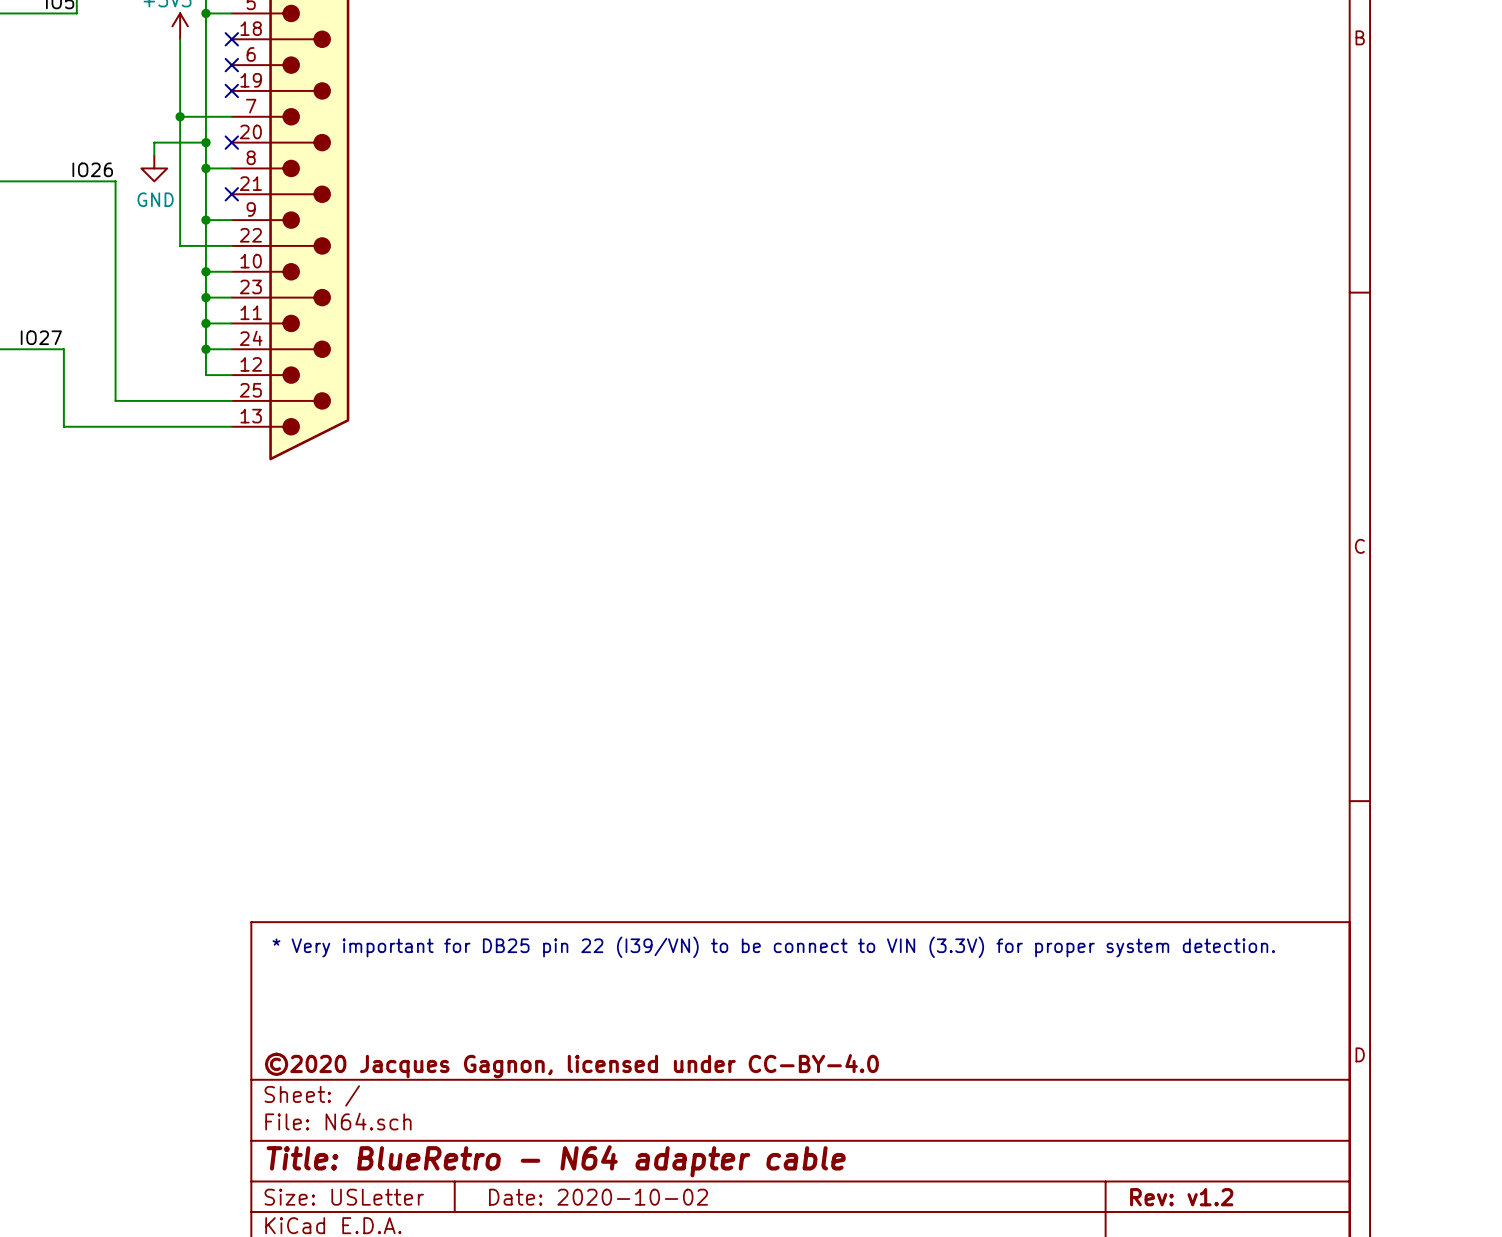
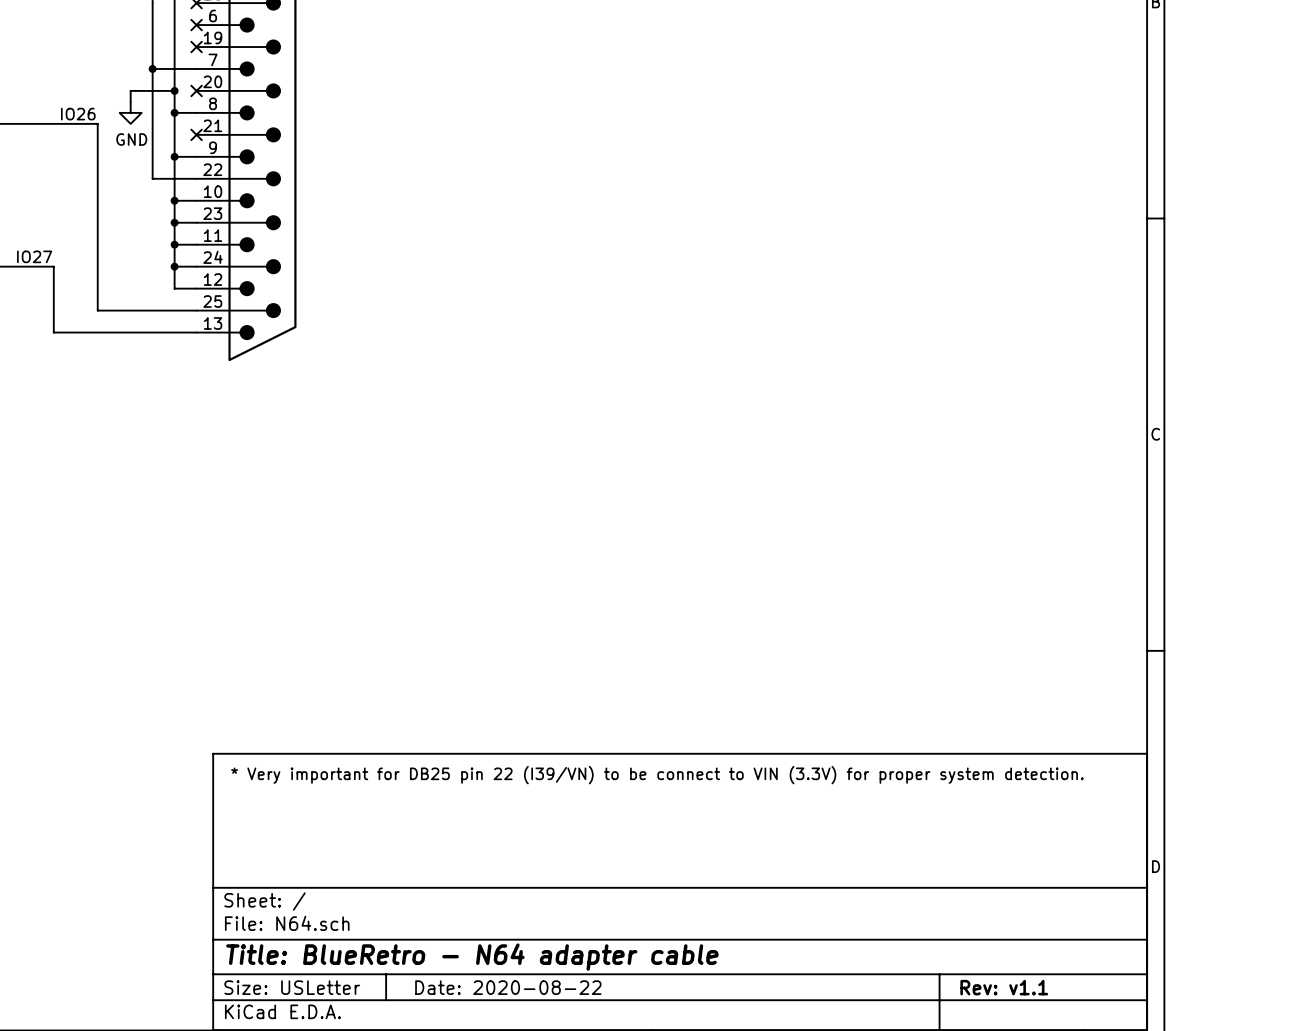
title block: ©2020 Jacques Gagnon, licensed under CC-BY-4.0 (571, 1065) -> none
title block: Date: 2020-10-02 (598, 1197) -> Date: 2020-08-22 (508, 987)
title block: Rev: v1.2 (1181, 1197) -> Rev: v1.1 (1004, 987)

